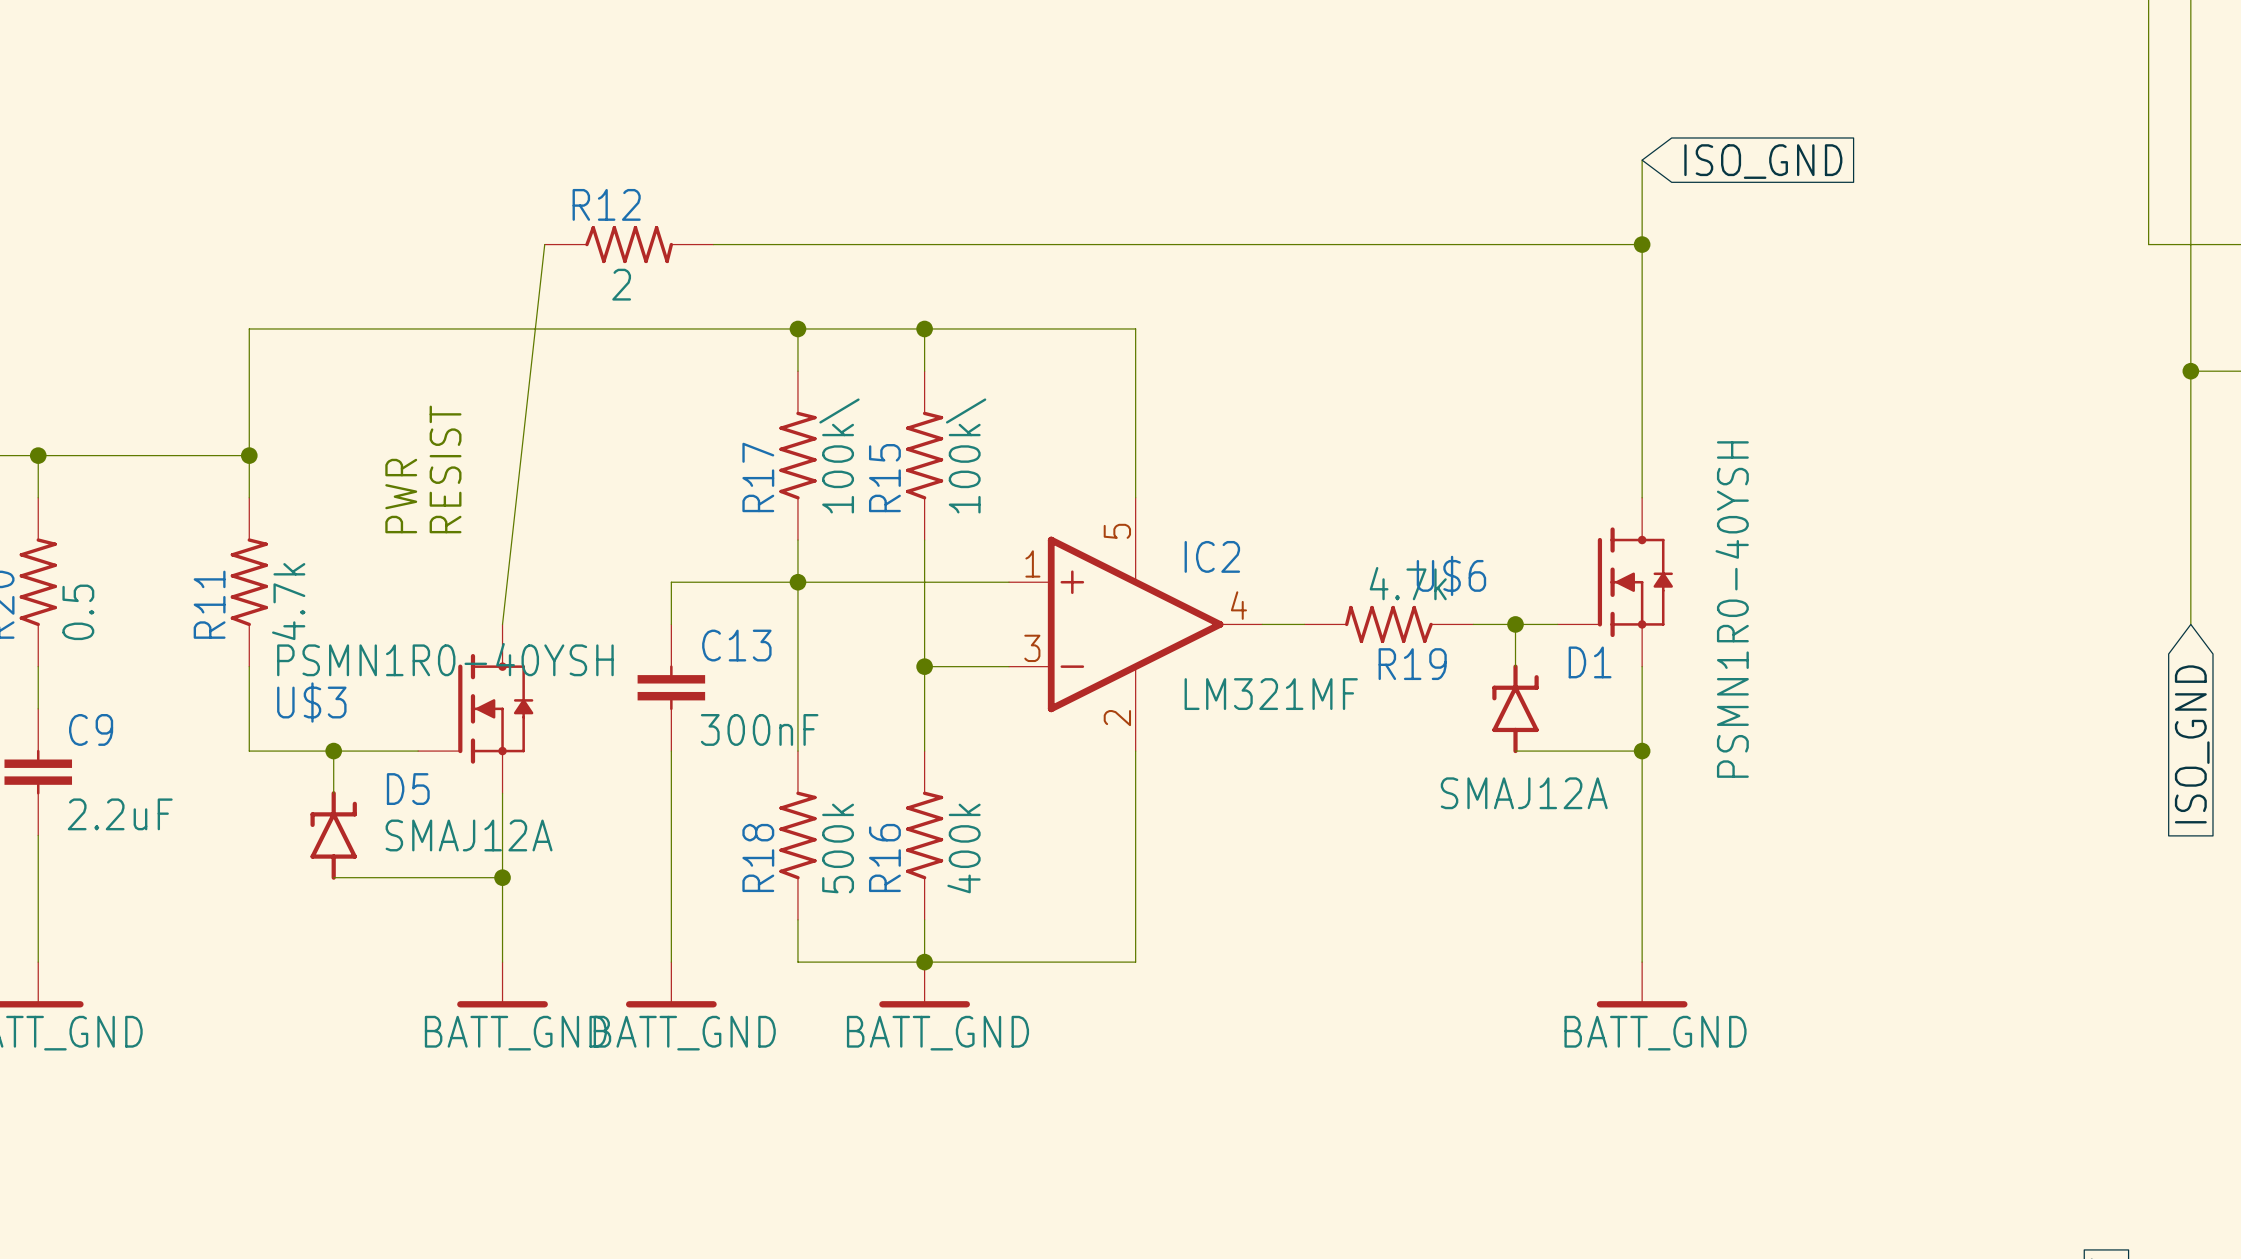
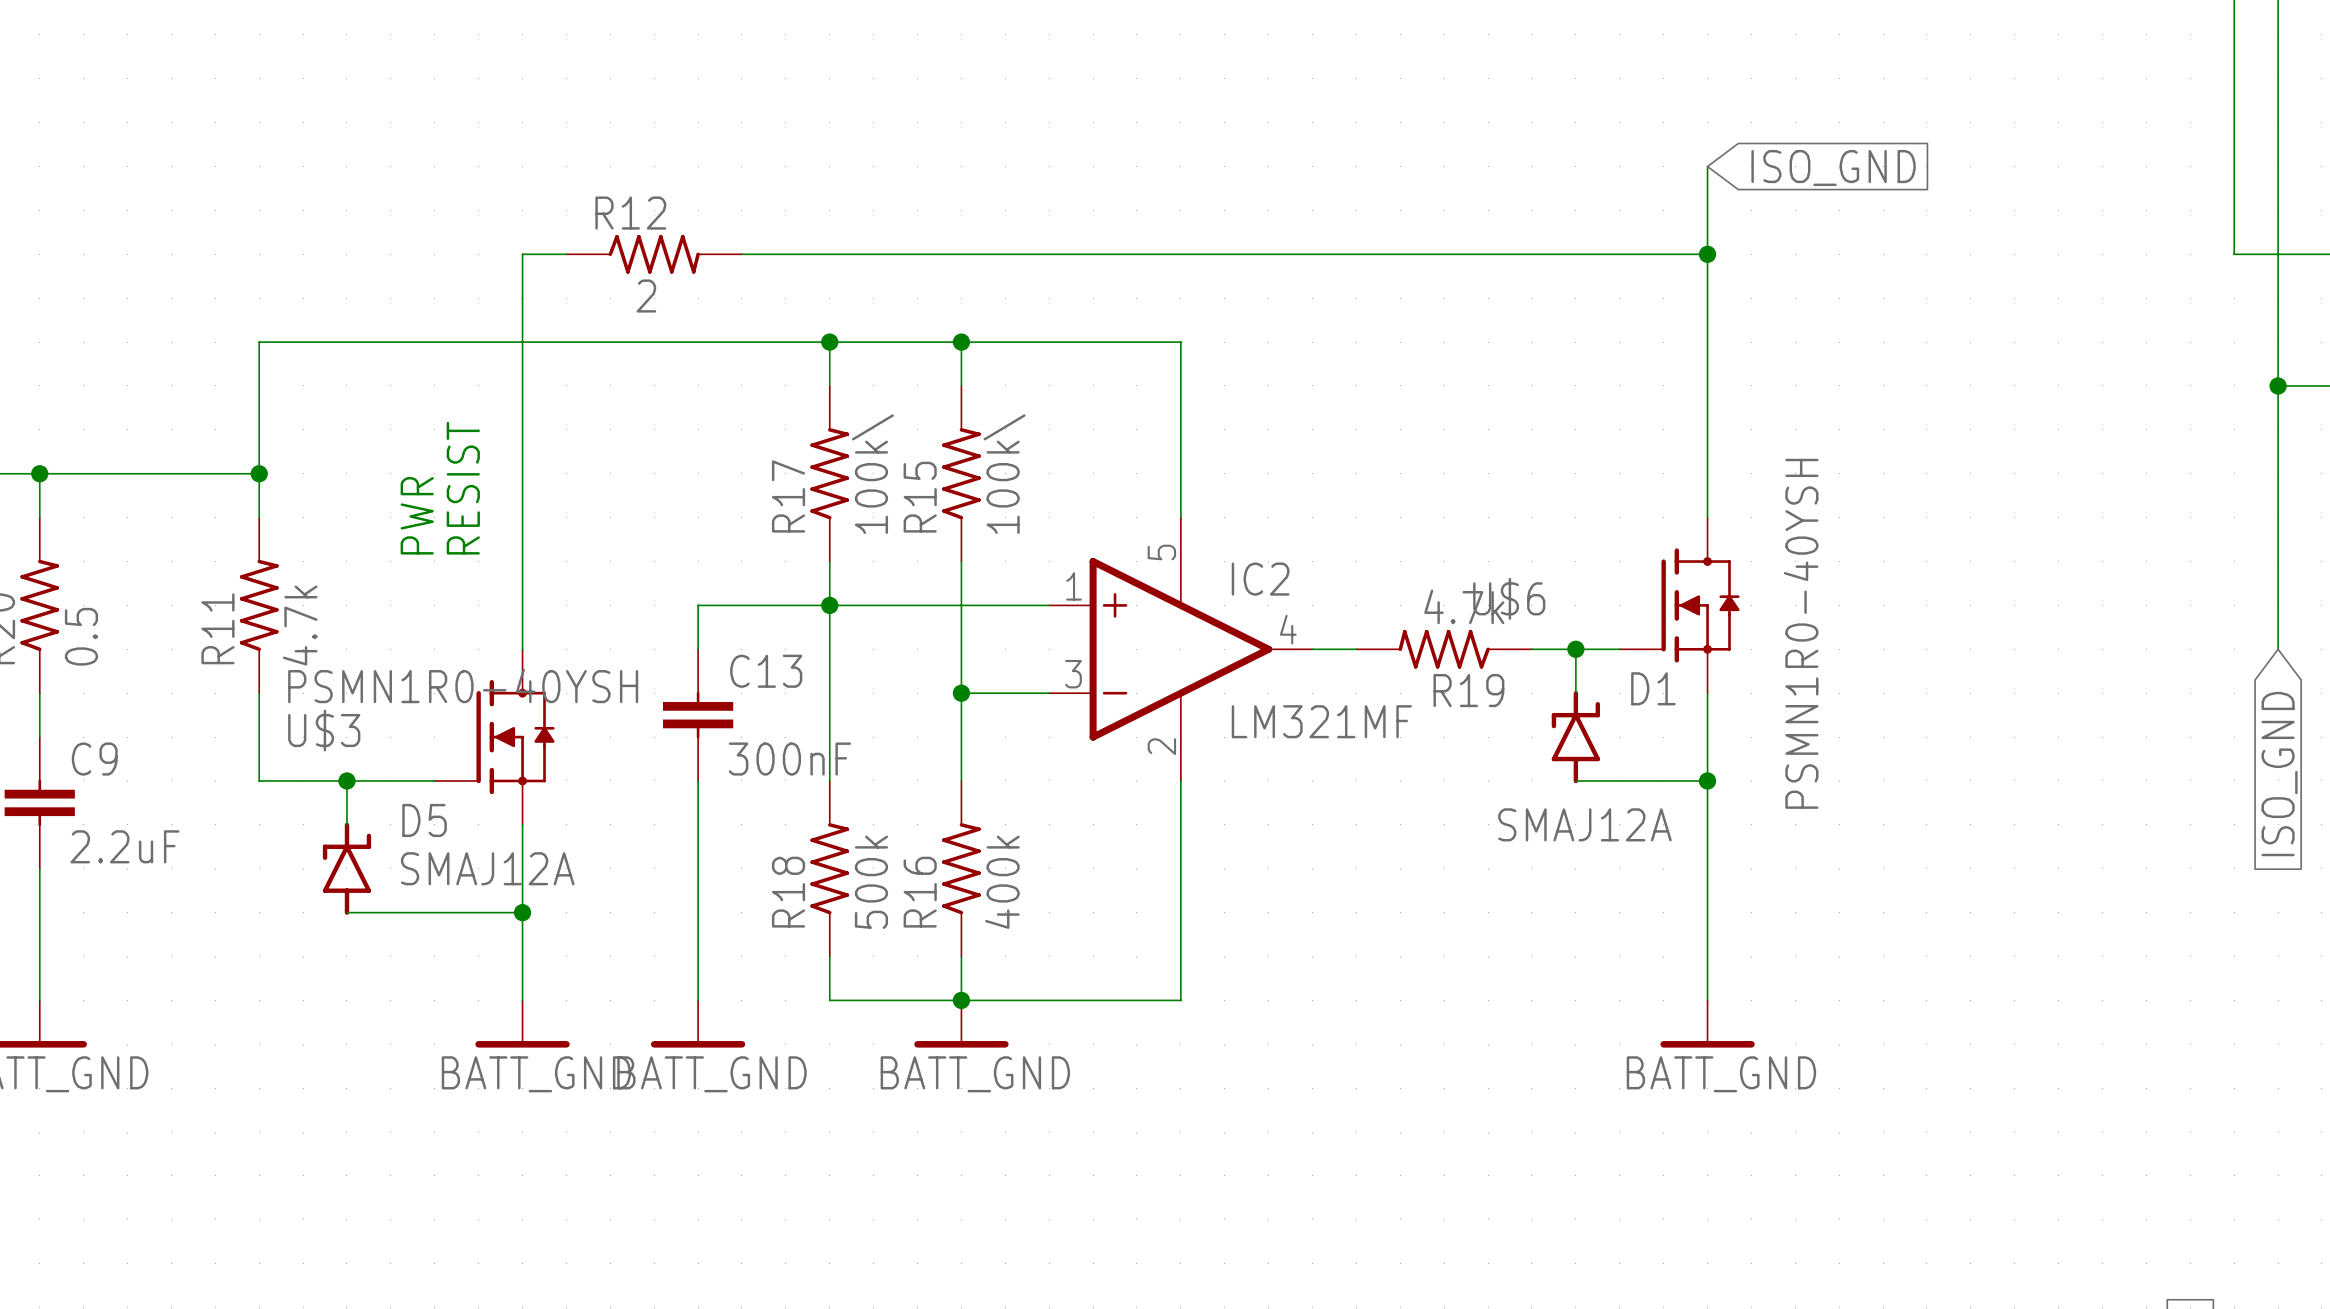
wire: (544, 244) (502, 624) -> (566, 254) (522, 254) (522, 649)

